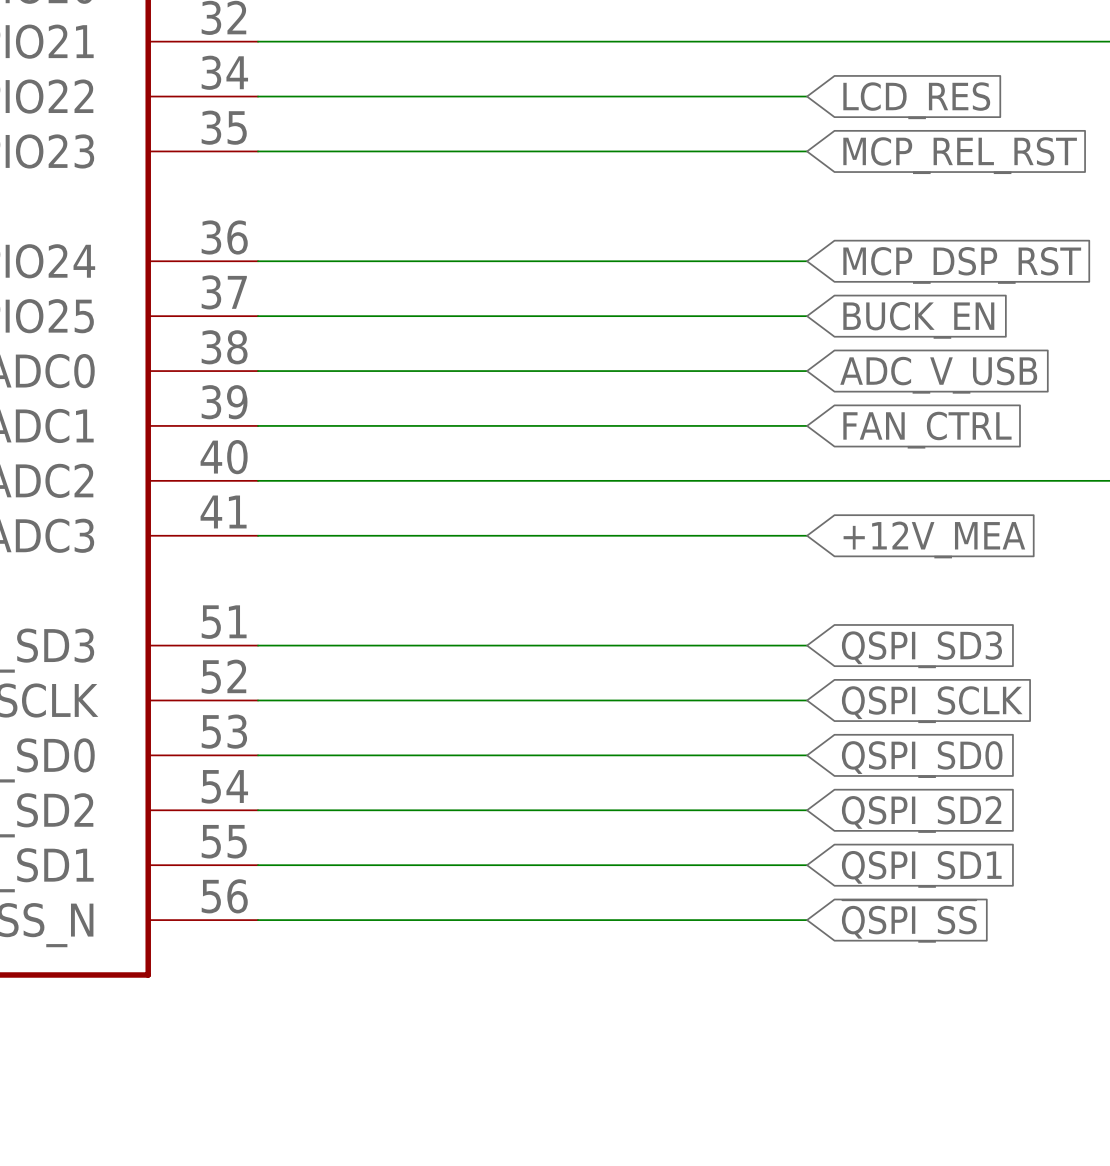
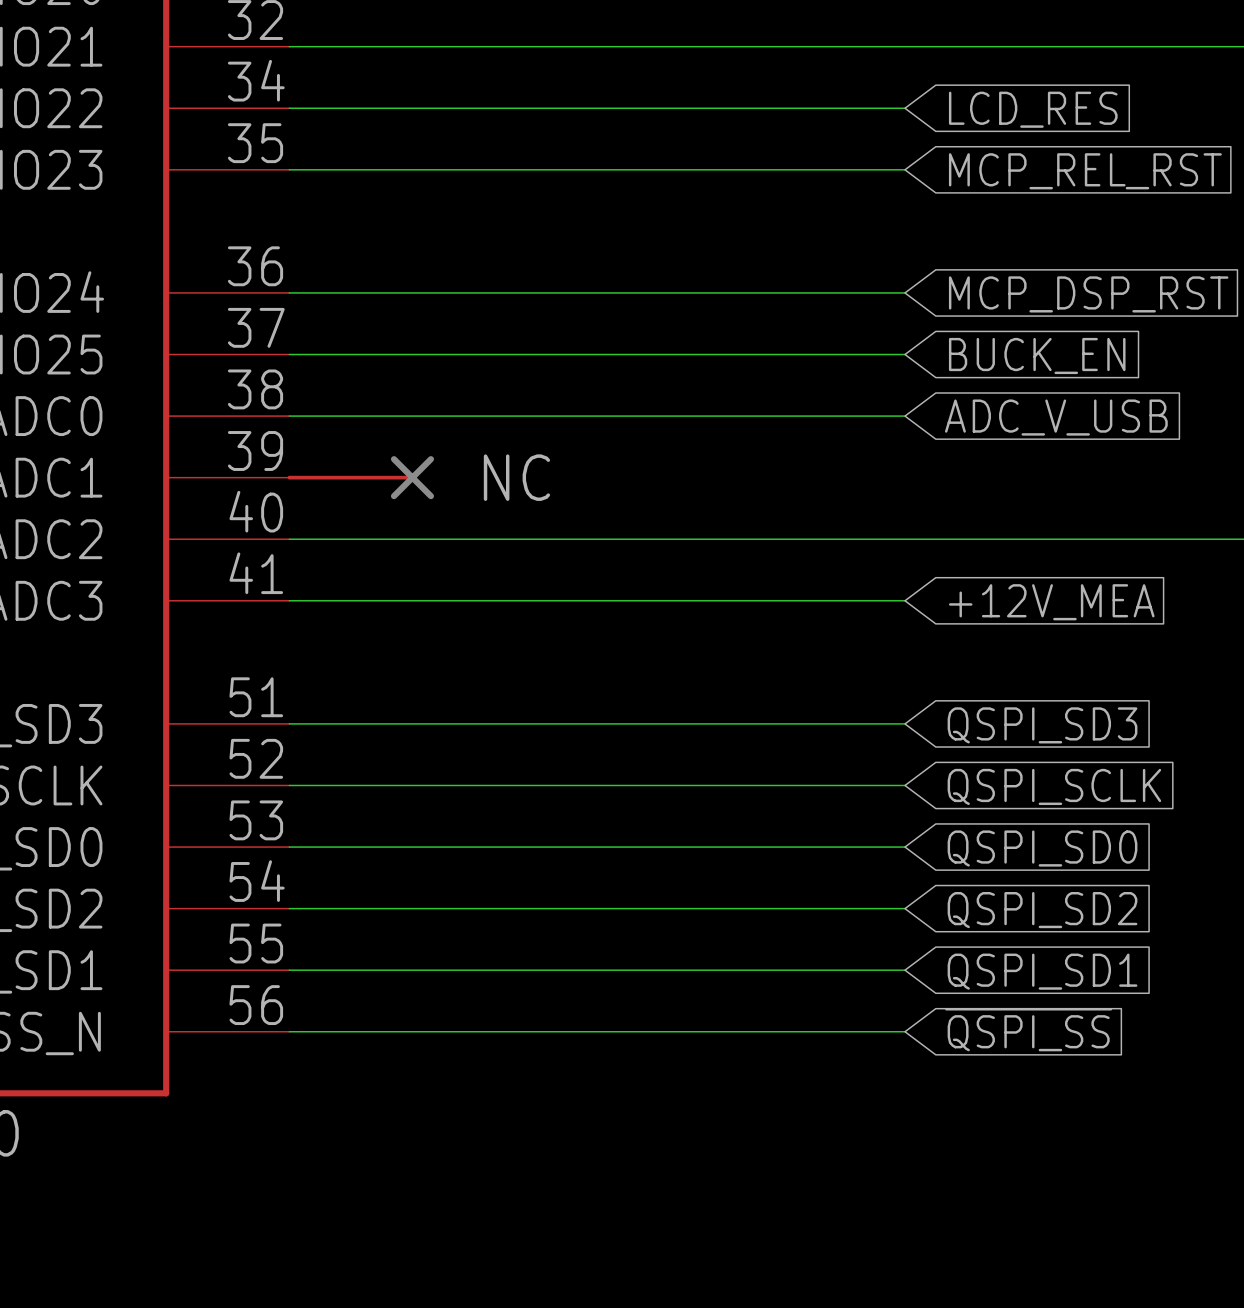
wire: (258, 425) (807, 425) -> none
part: none -> (360, 477)
global label: FAN_CTRL (927, 430) -> none

